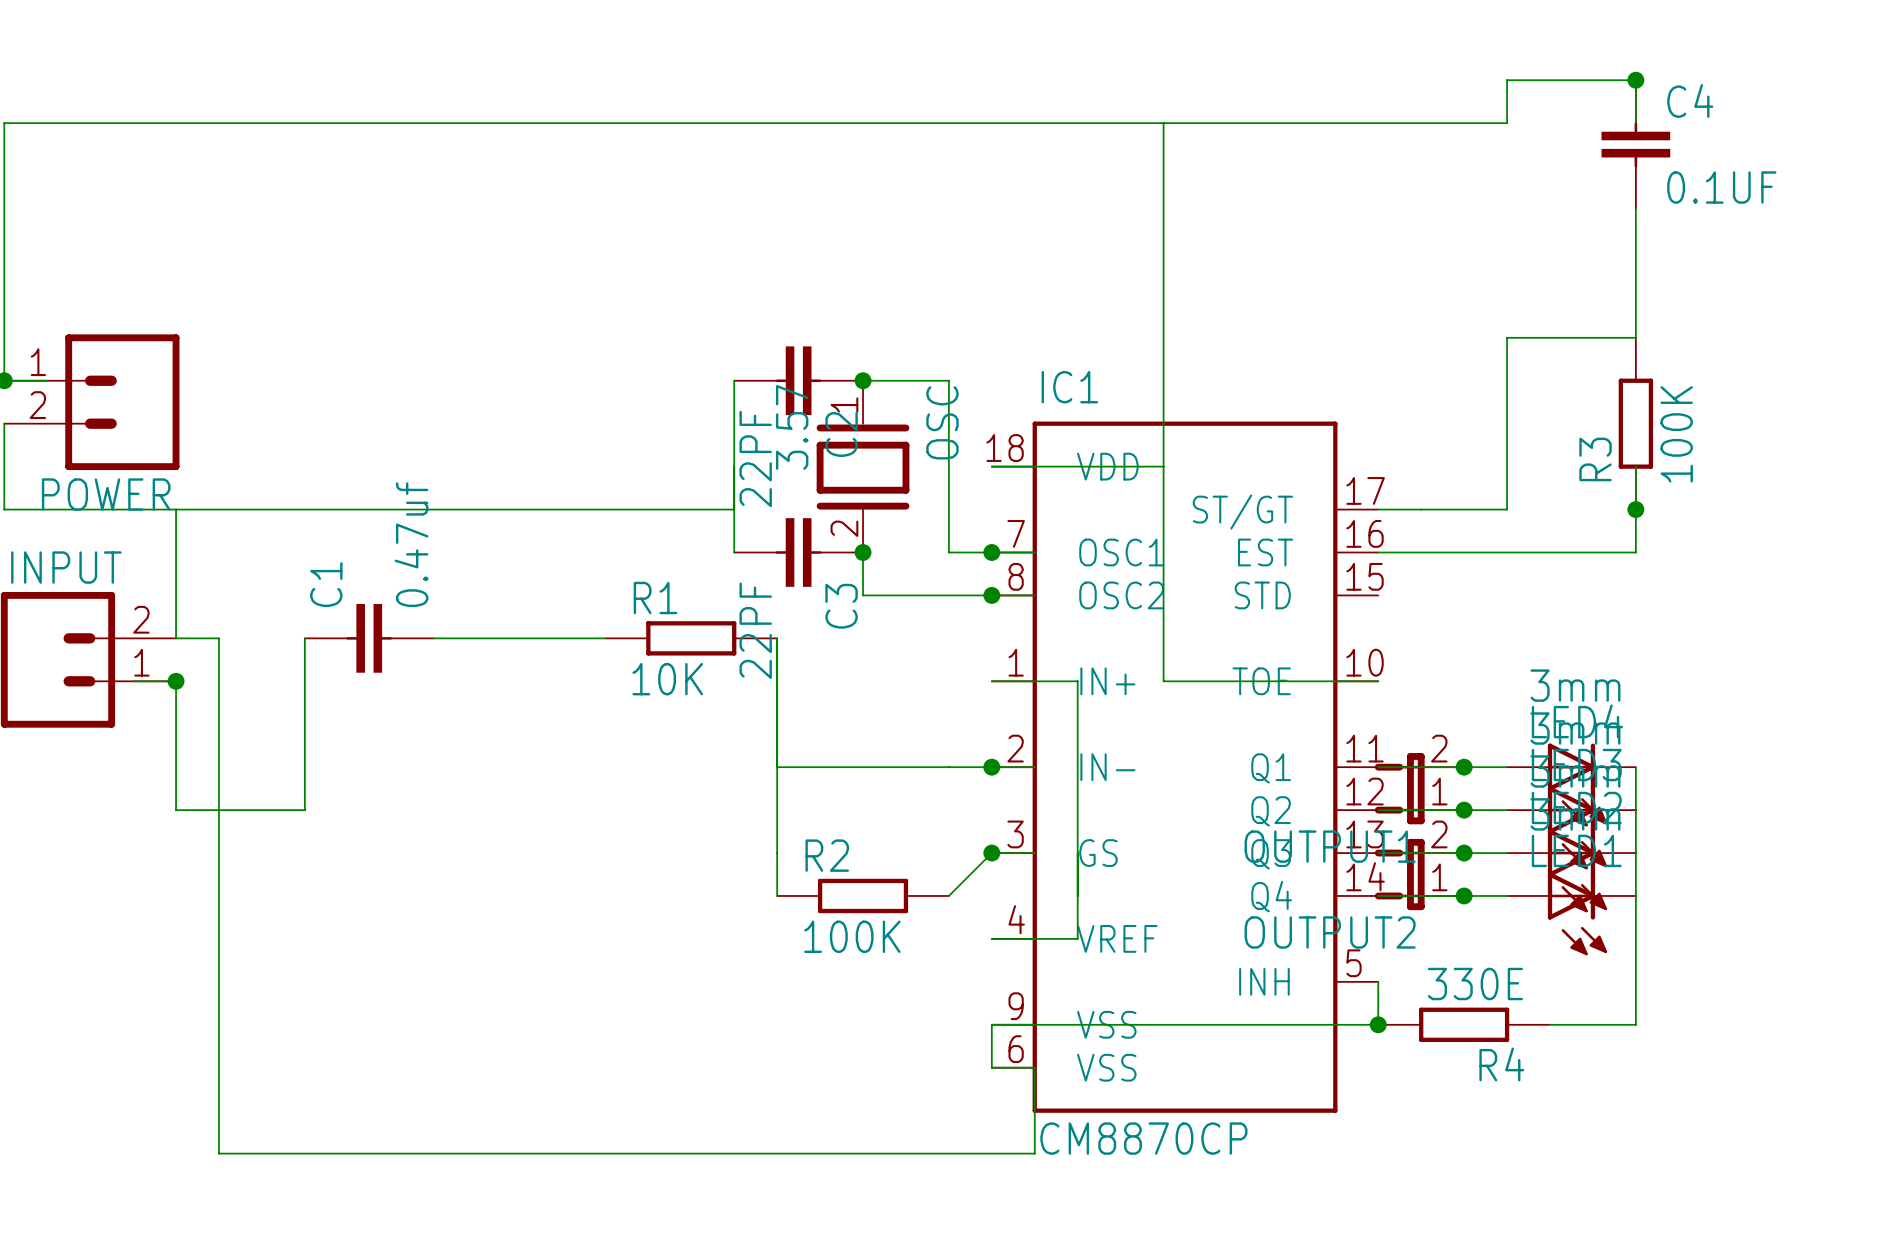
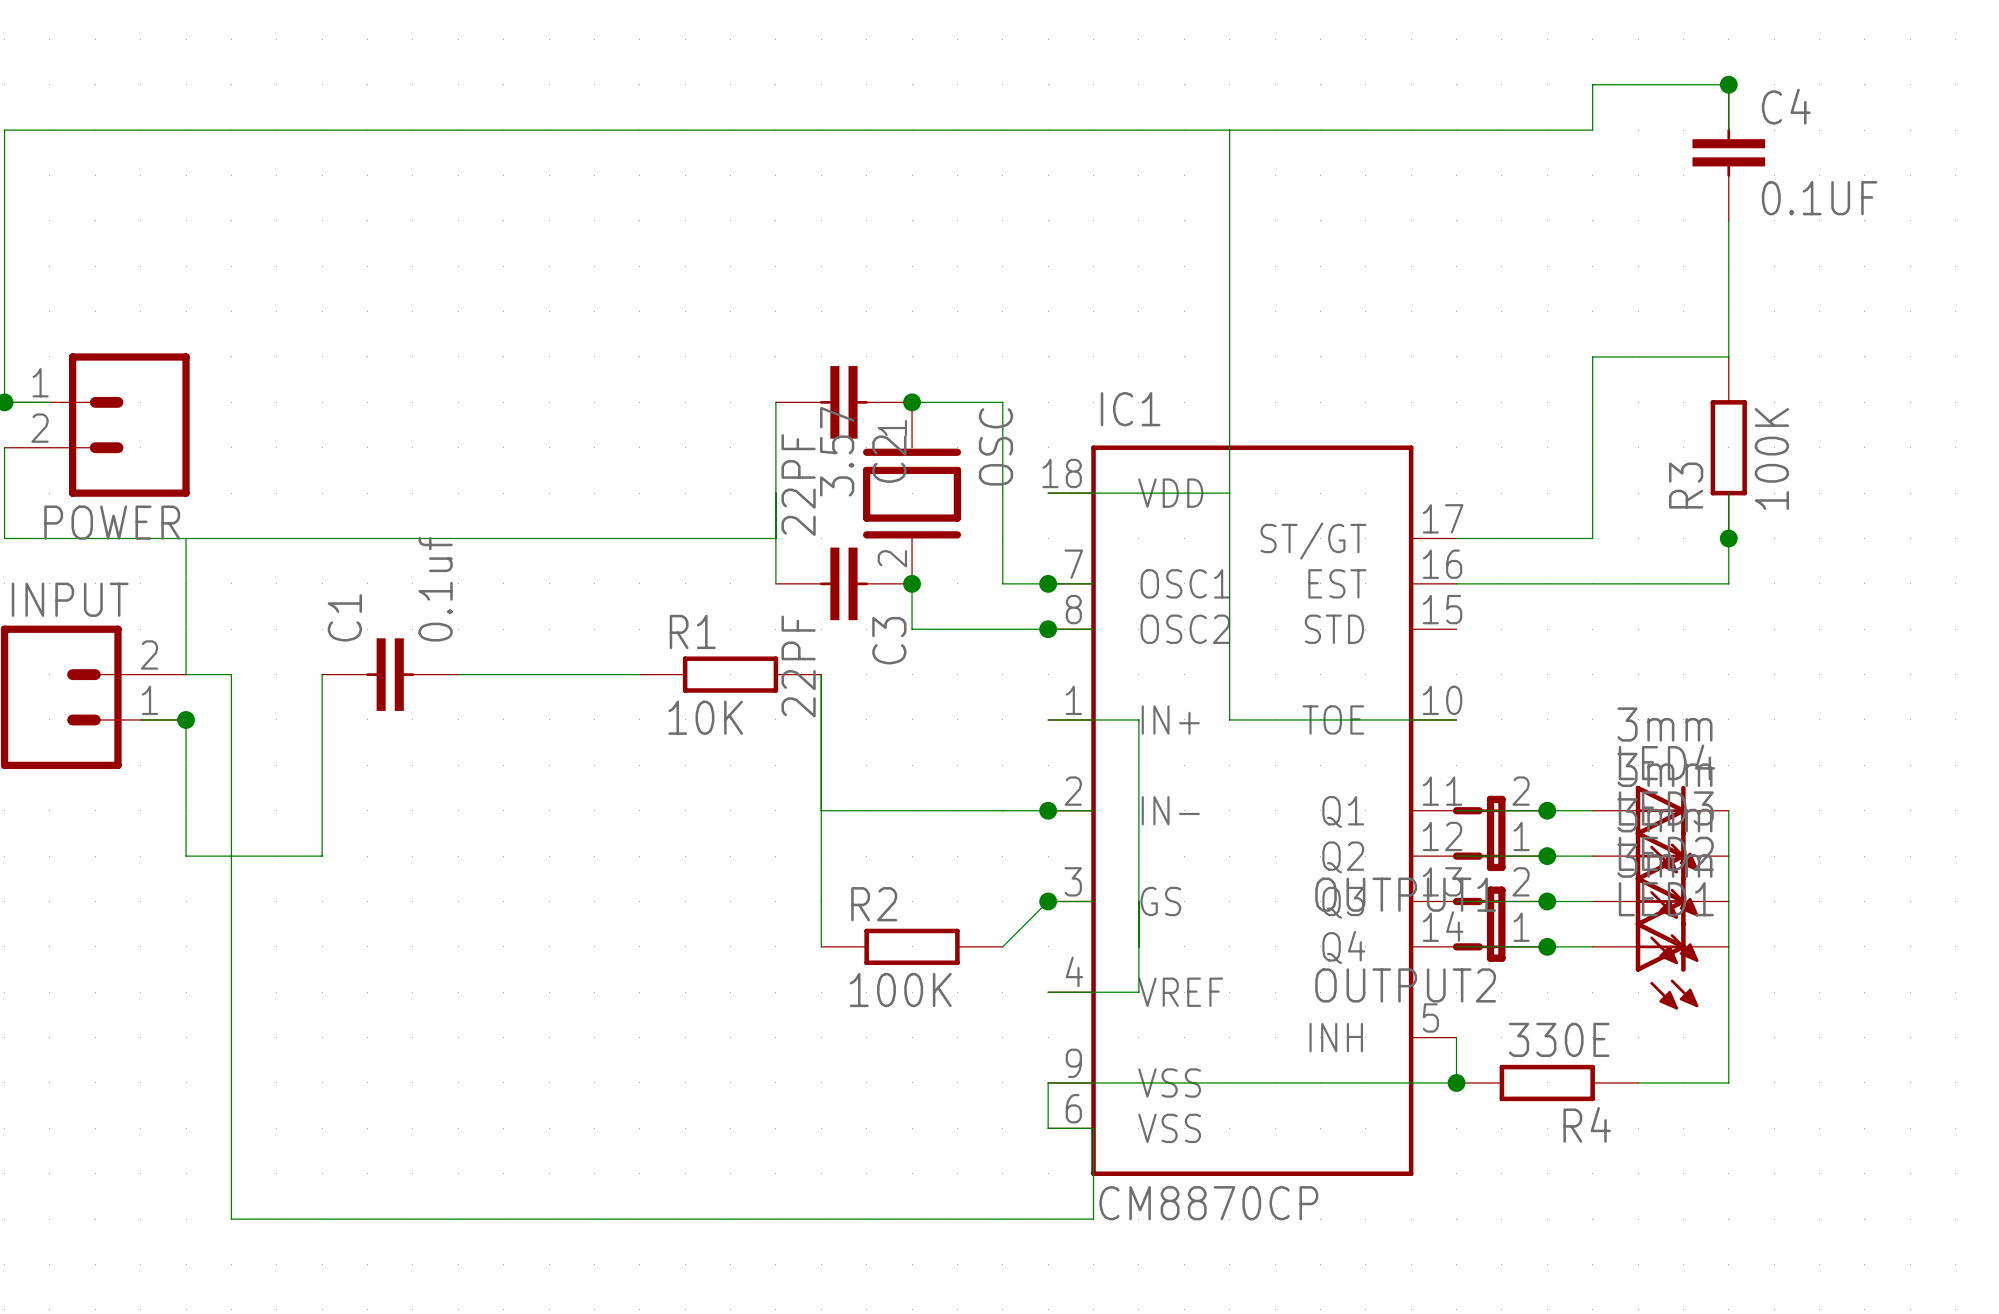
C1 value: 0.47uf (411, 544) -> 0.1uf (435, 589)

